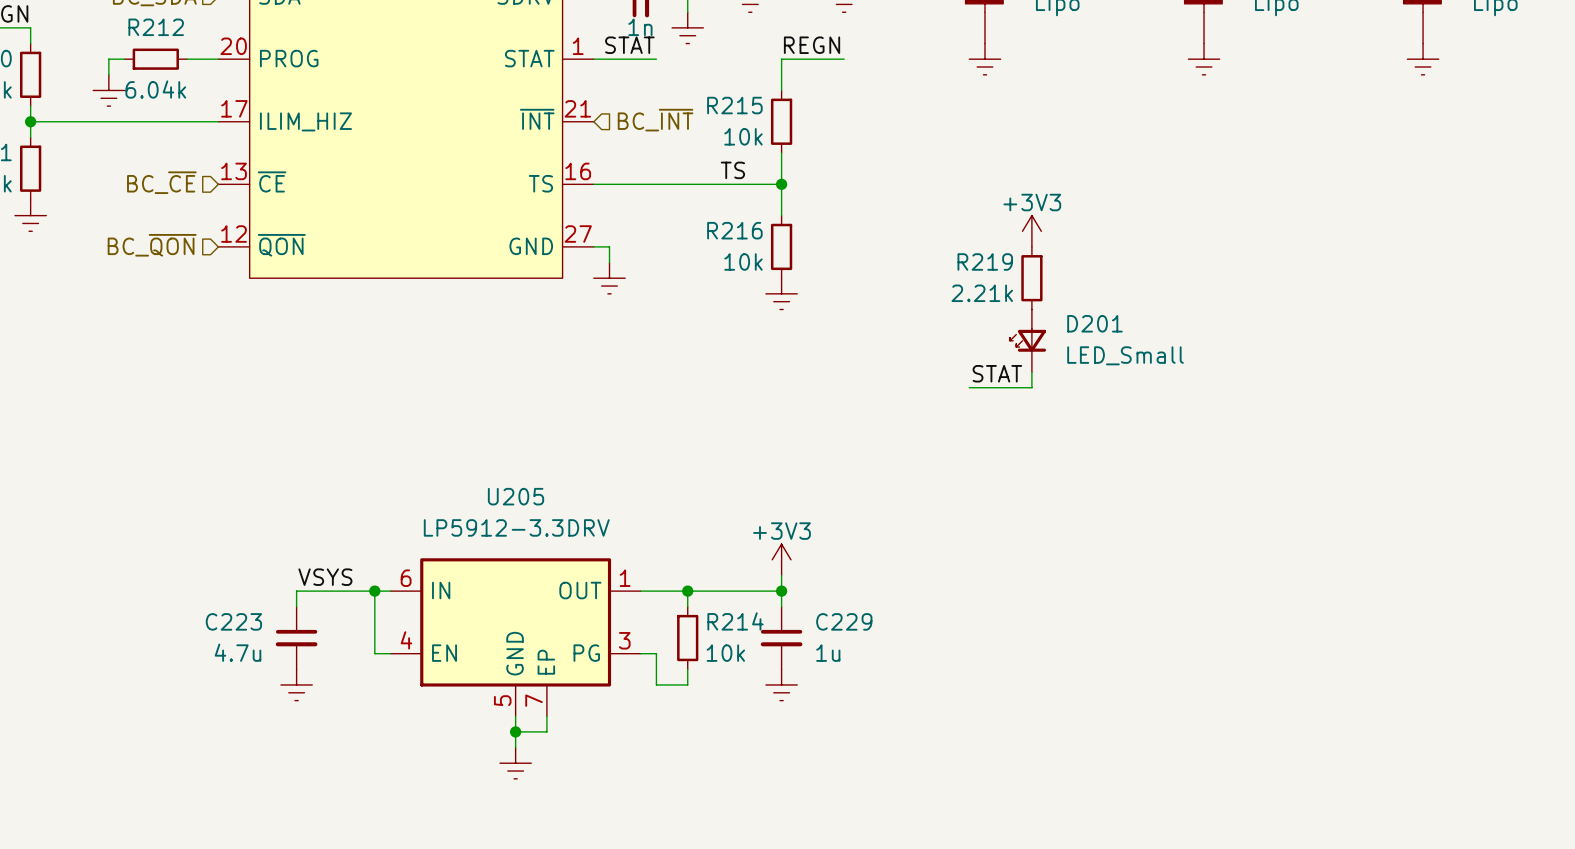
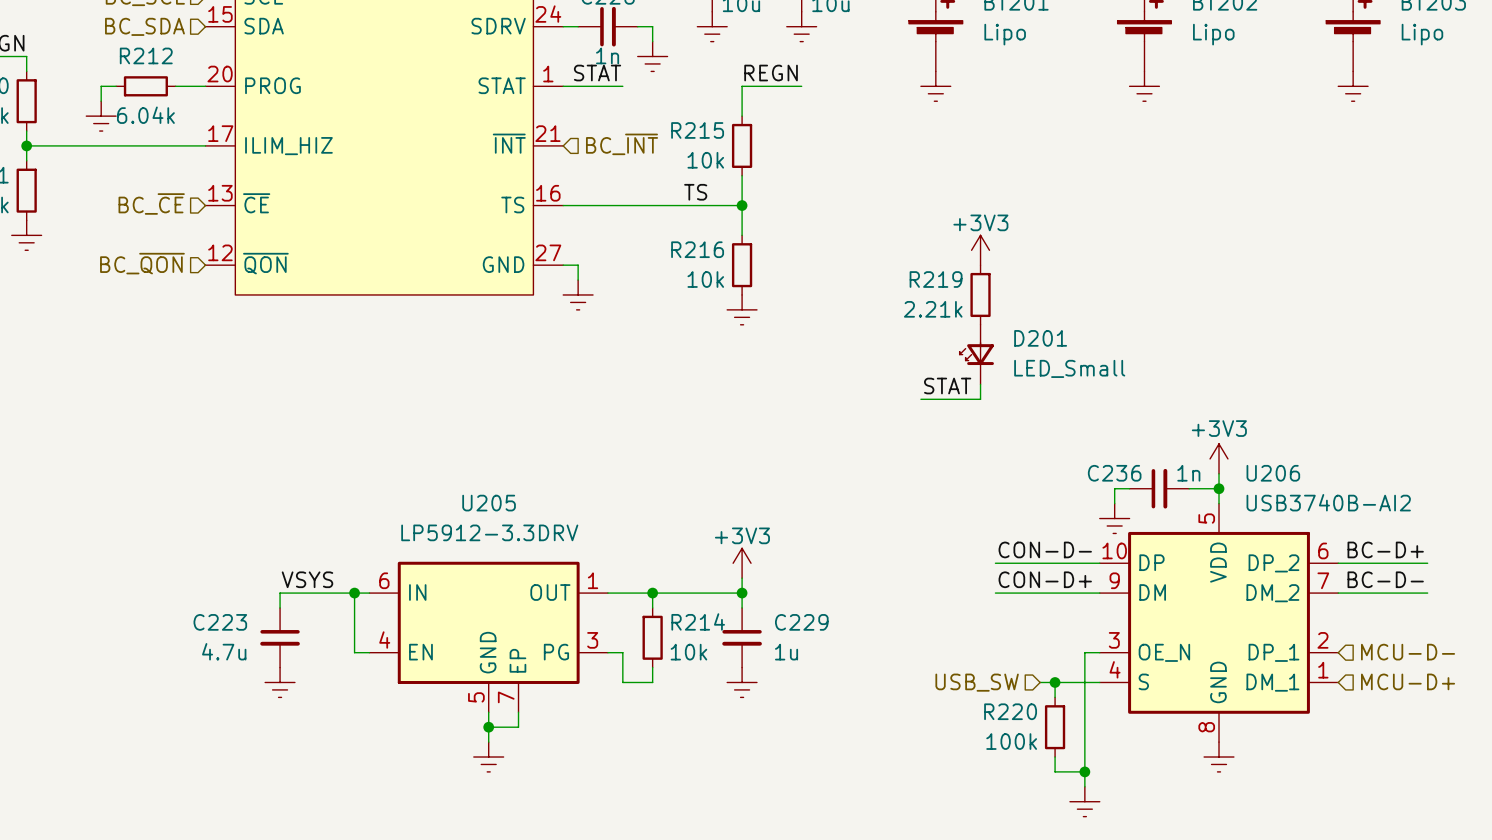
power symbol: none -> +3V3 (1219, 458)
wire: none -> (1219, 473) (1219, 503)
wire: none -> (1129, 488) (1114, 488) (1114, 503)
C236: none -> 1n (1159, 488)
wire: none -> (1189, 488) (1219, 488)
junction: none -> (1219, 488)
power symbol: none -> (1114, 518)
label: none -> CON-D- (1045, 549)
label: none -> BC-D+ (1385, 549)
wire: none -> (995, 563) (1099, 563)
wire: none -> (1338, 563) (1427, 563)
label: none -> CON-D+ (1045, 579)
label: none -> BC-D- (1385, 579)
wire: none -> (995, 593) (1099, 593)
wire: none -> (1338, 593) (1427, 593)
U206: none -> USB3740B-AI2 (1219, 622)
wire: none -> (1099, 652) (1084, 652) (1084, 786)
hierarchical label: none -> MCU-D- (1408, 652)
wire: none -> (1040, 682) (1099, 682)
wire: none -> (1055, 682) (1055, 697)
junction: none -> (1055, 682)
hierarchical label: none -> MCU-D+ (1408, 681)
hierarchical label: none -> USB_SW (977, 682)
R220: none -> 100k (1055, 727)
wire: none -> (1055, 757) (1055, 771) (1084, 771)
power symbol: none -> (1219, 757)
junction: none -> (1084, 771)
power symbol: none -> (1084, 801)

